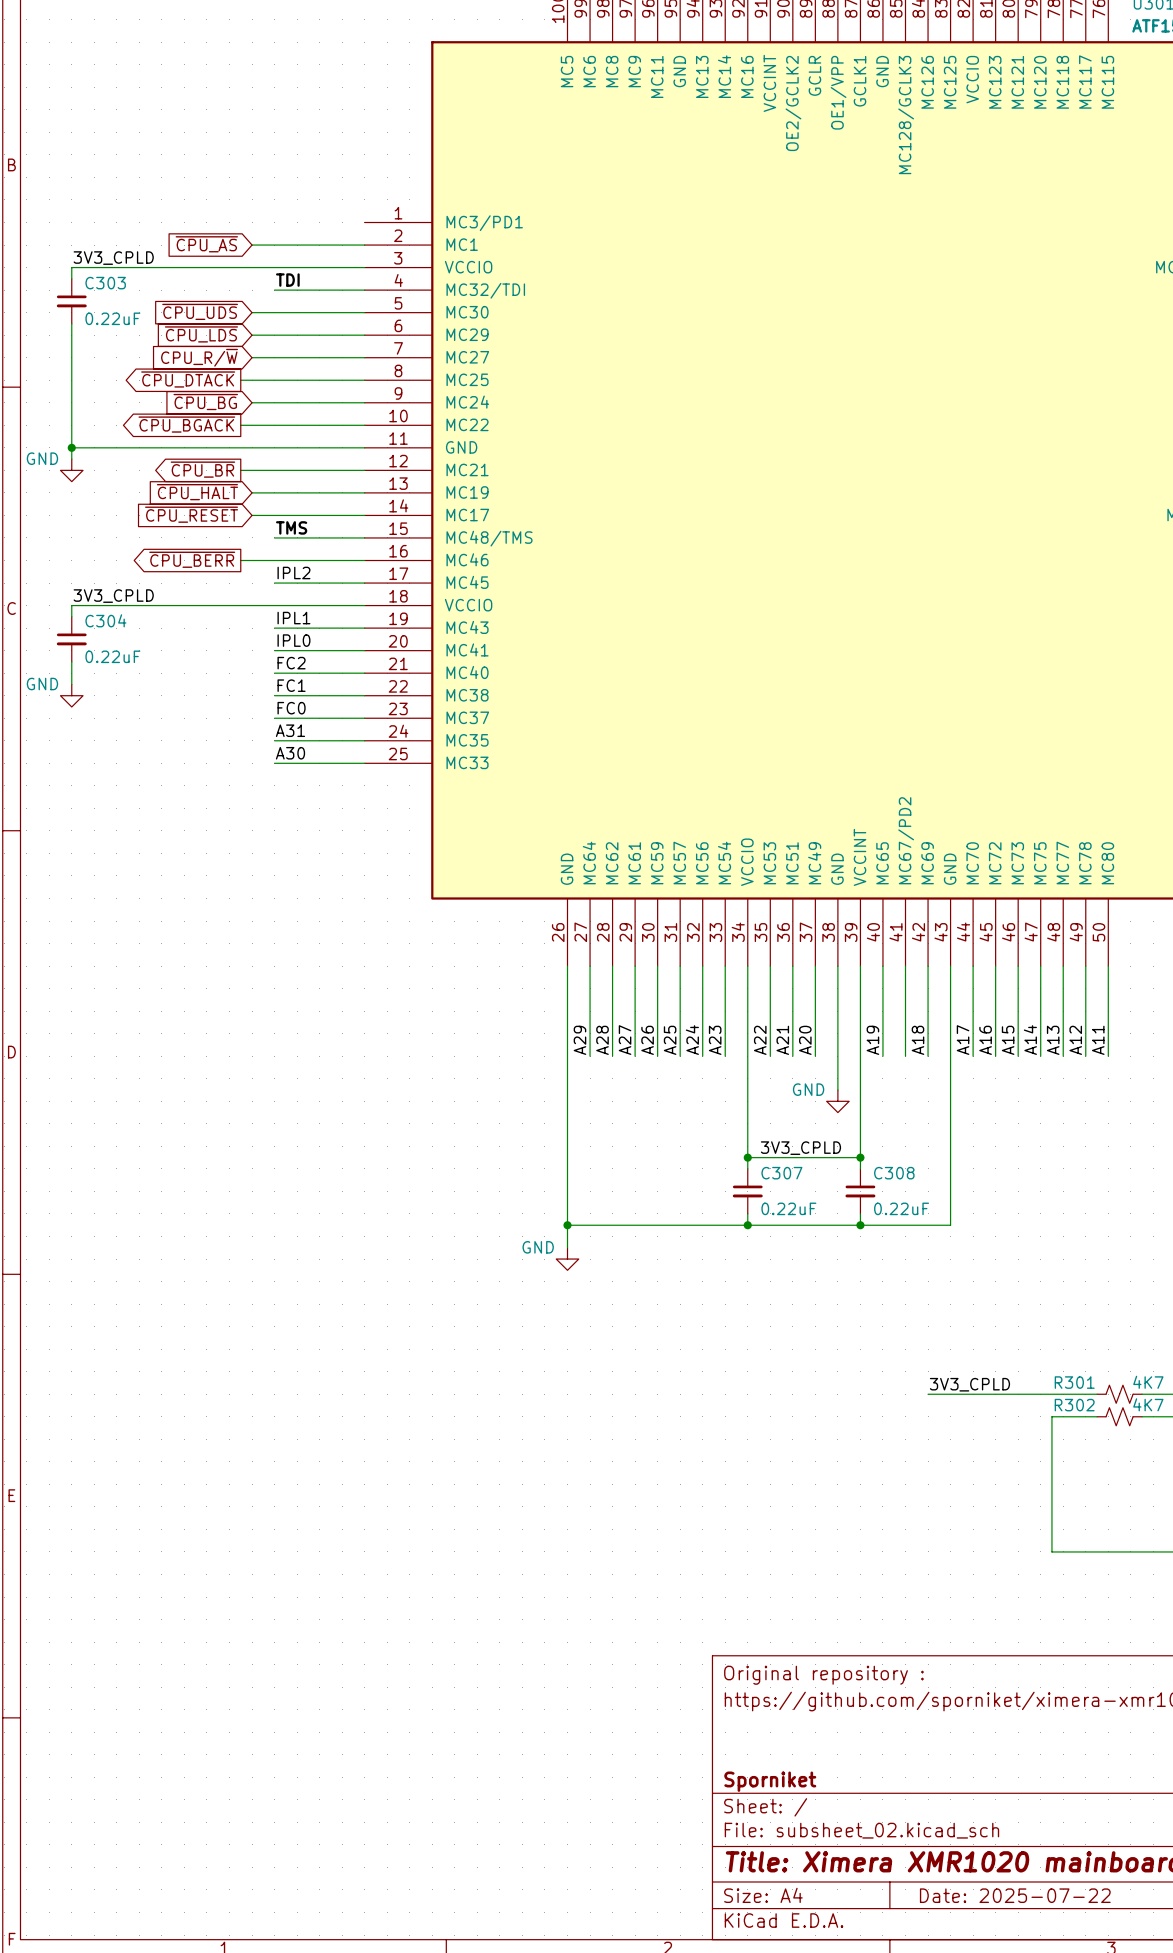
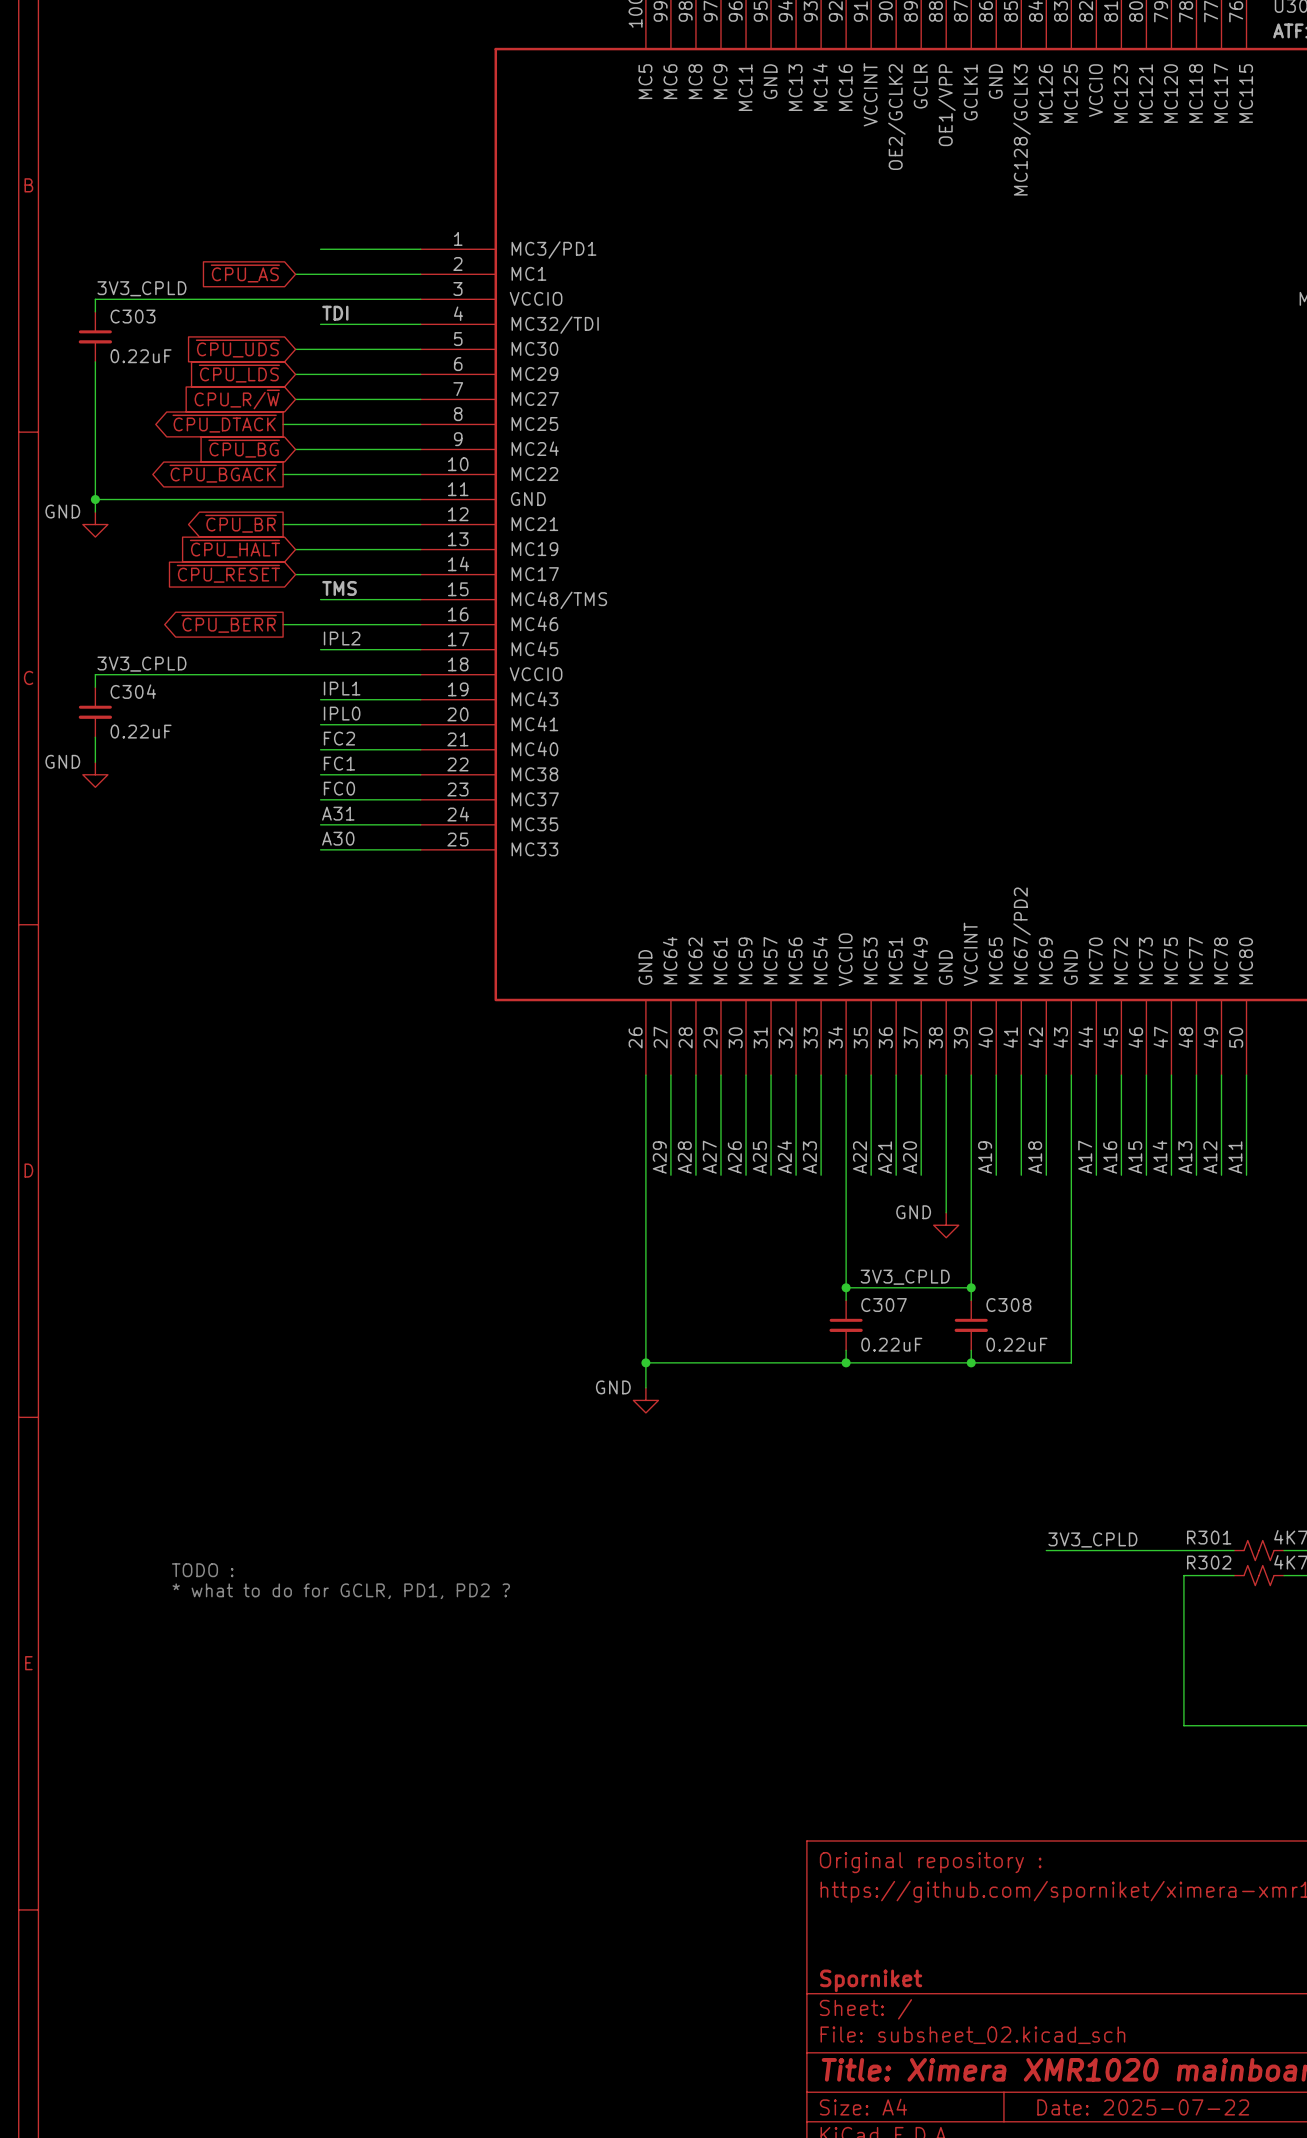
wire: none -> (320, 249) (420, 249)
text: none -> TODO : (202, 1570)
text: none -> * what to do for GCLR, PD1, PD2 ? (341, 1591)

